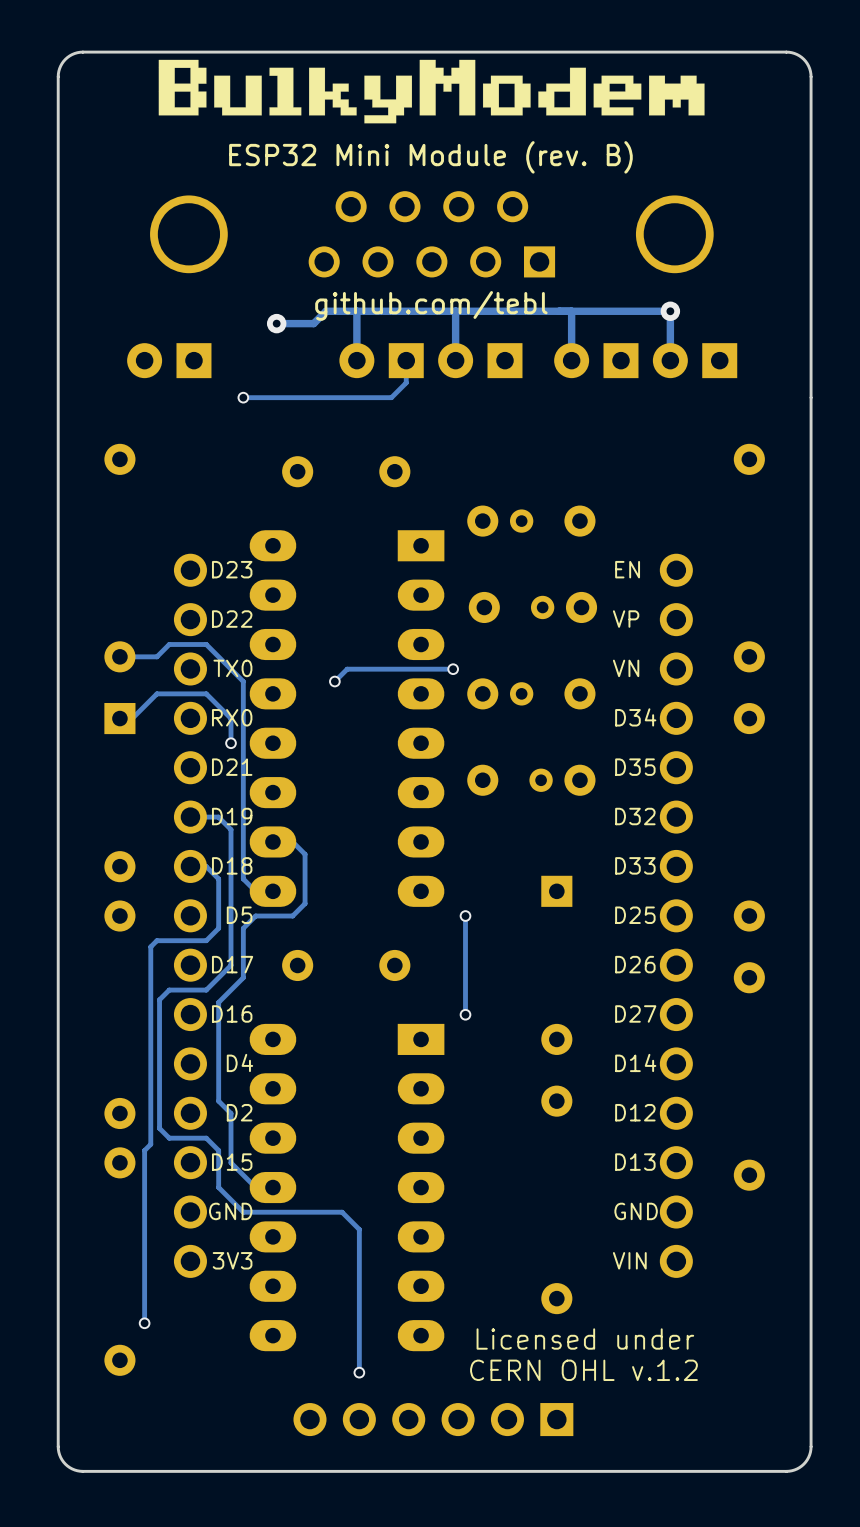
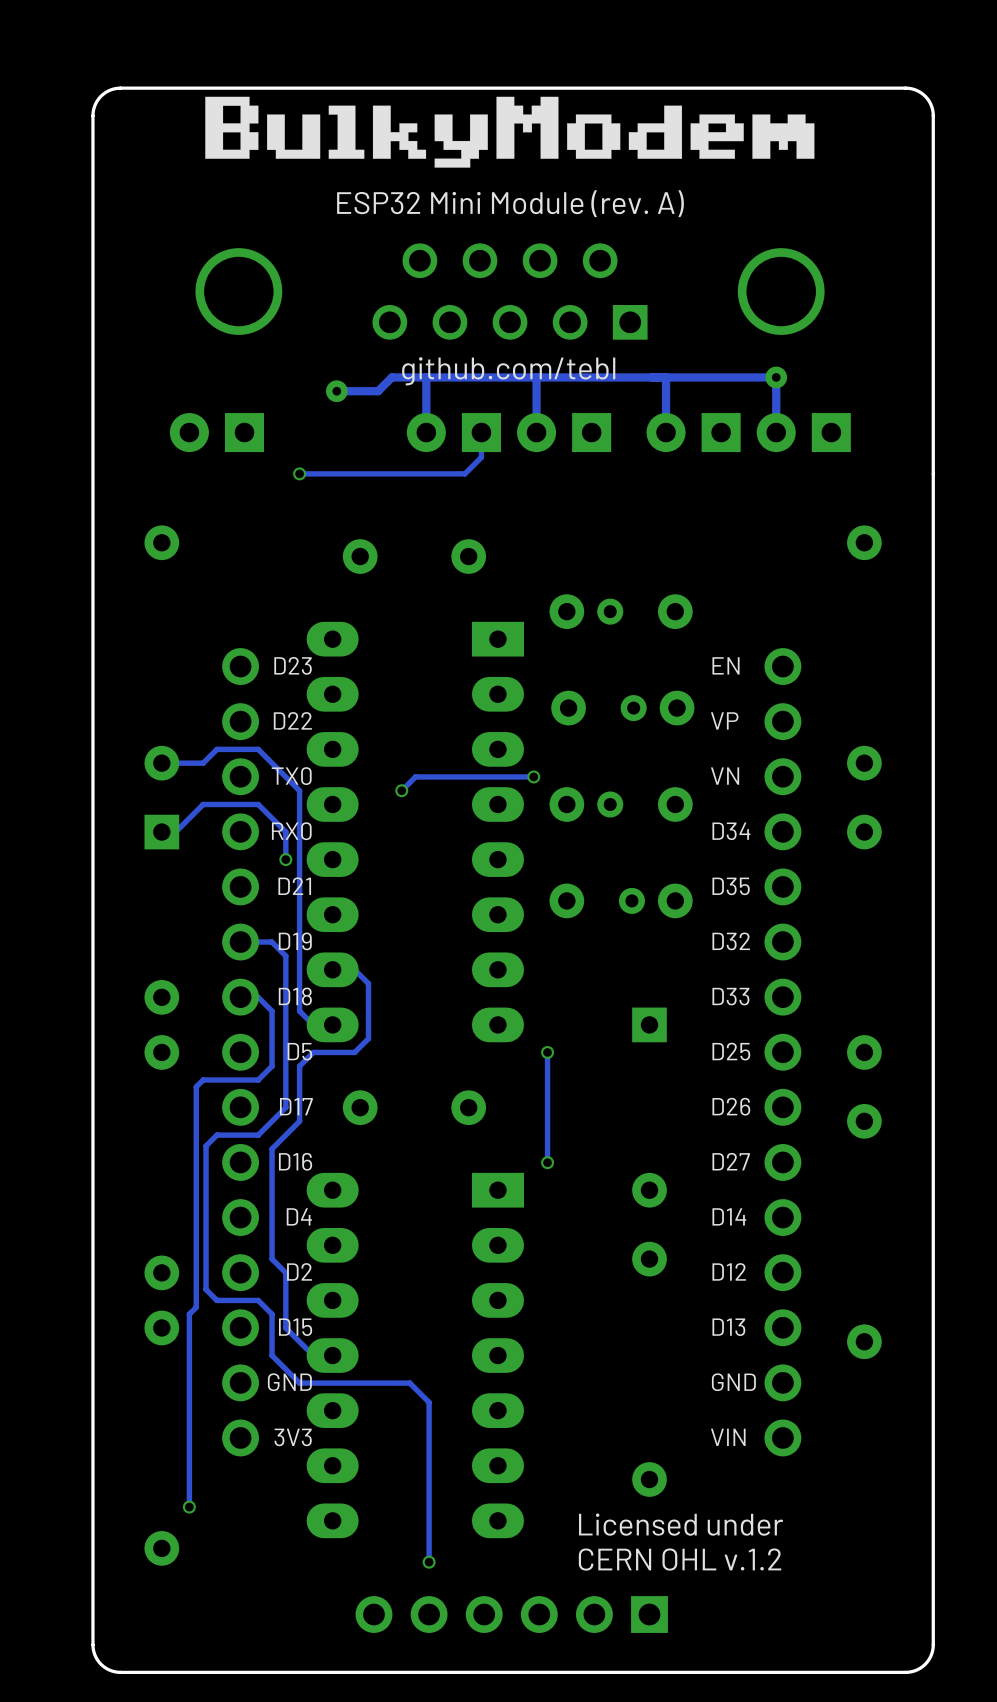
text: ESP32 Mini Module (rev. B) (430, 157) -> ESP32 Mini Module (rev. A) (510, 203)

